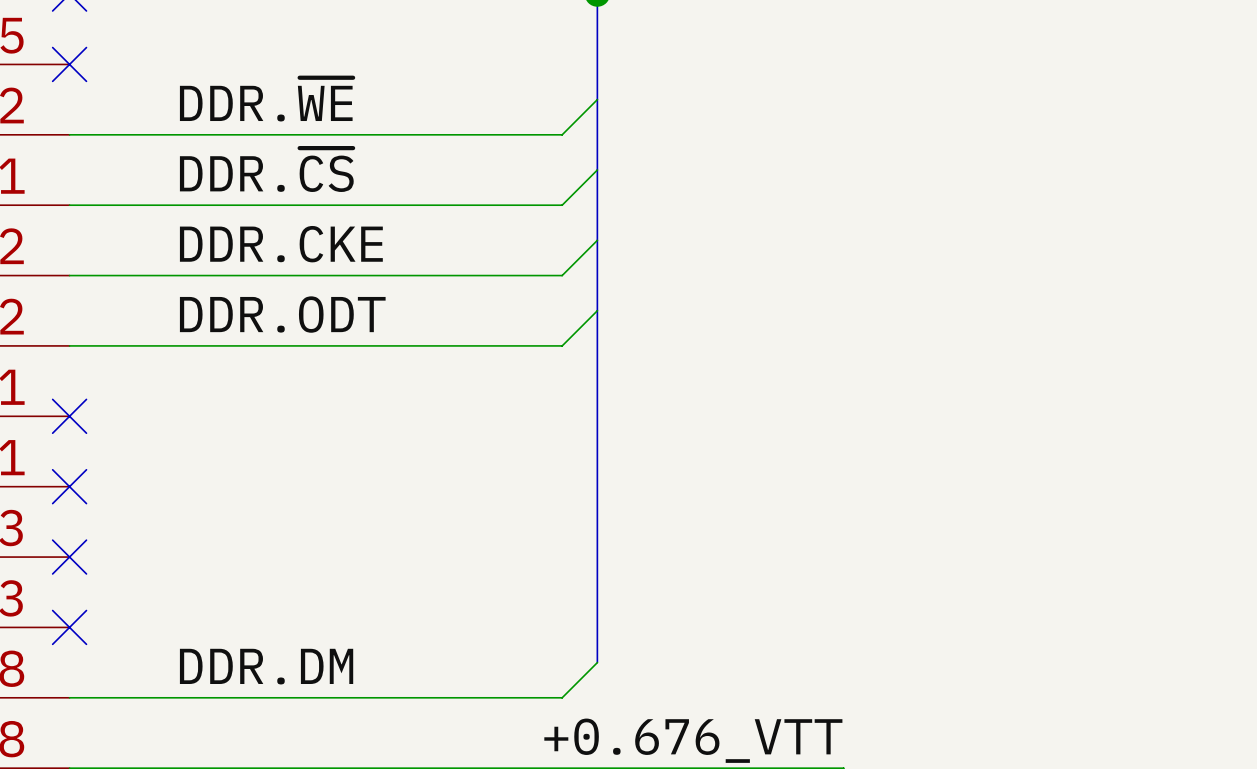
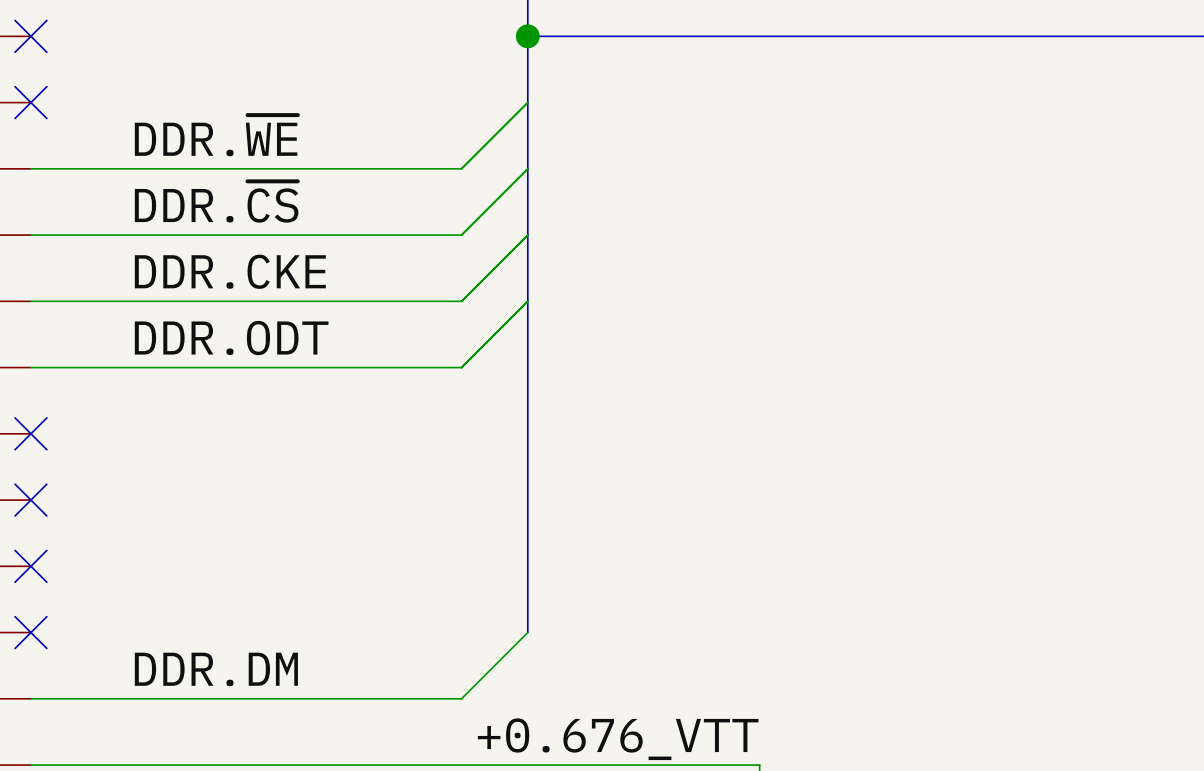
wire: (597, 99) (562, 134) (526, 134) -> (527, 102) (461, 168)
wire: (597, 170) (562, 205) (526, 205) -> (527, 168) (461, 235)
wire: (597, 240) (562, 275) (526, 275) -> (527, 235) (461, 301)
wire: (597, 310) (562, 345) (526, 345) -> (527, 301) (461, 367)
bus: (597, 627) (597, 662) -> none
wire: (597, 662) (562, 697) (526, 697) -> (527, 632) (461, 698)

